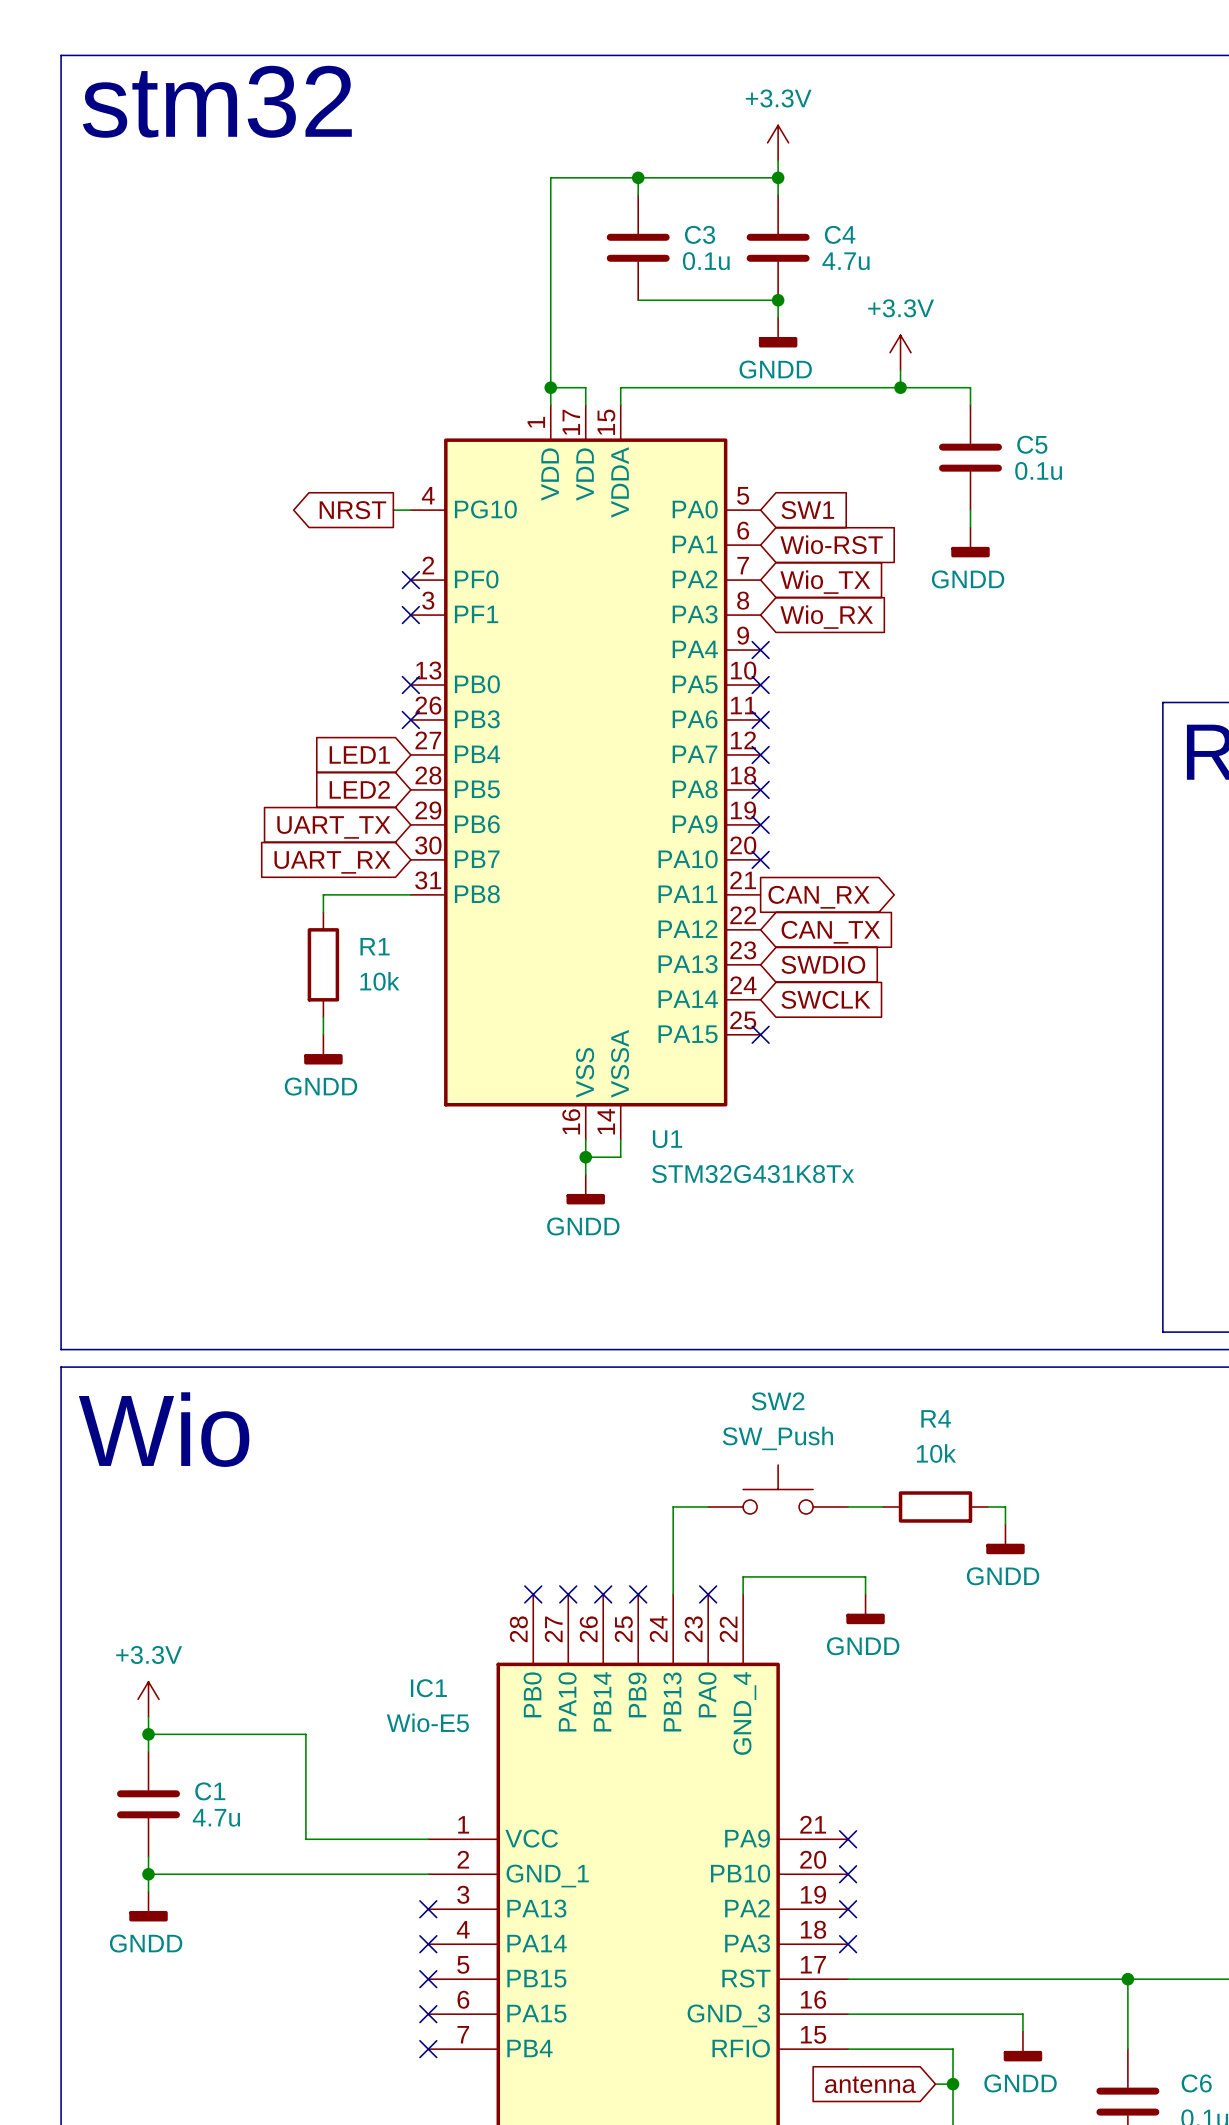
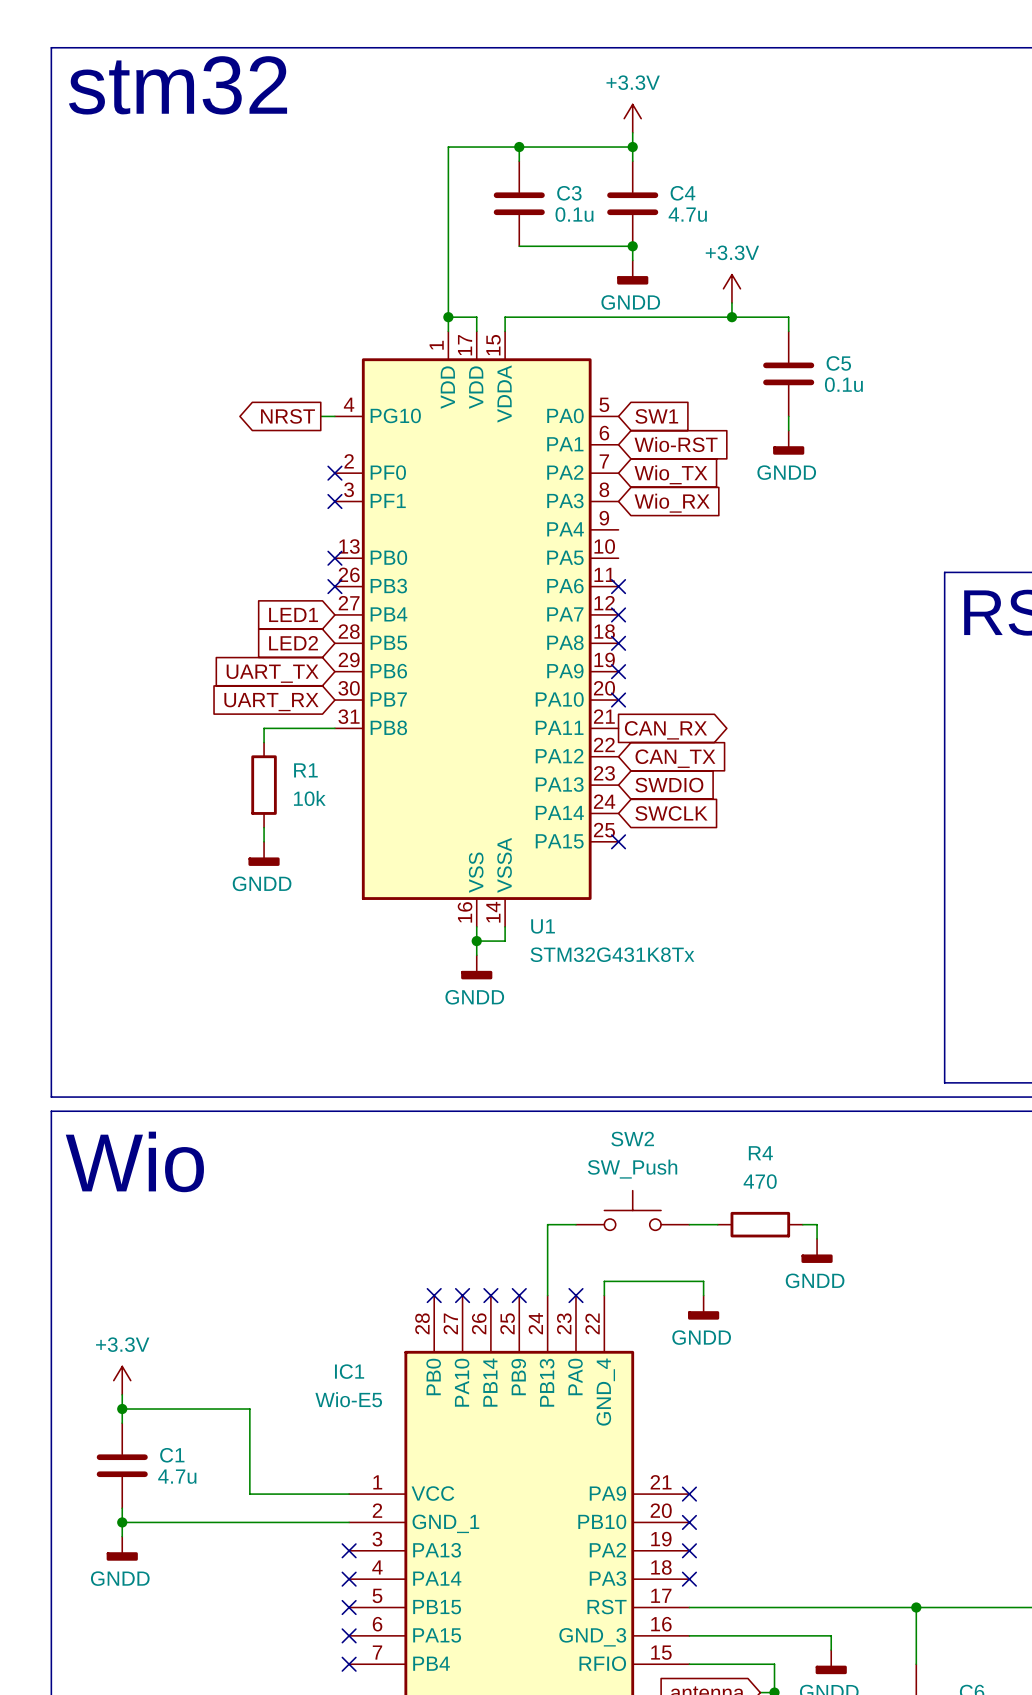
no-connect mark: (760, 650) -> none
no-connect mark: (760, 685) -> none
R4 value: 10k (936, 1453) -> 470 (760, 1181)

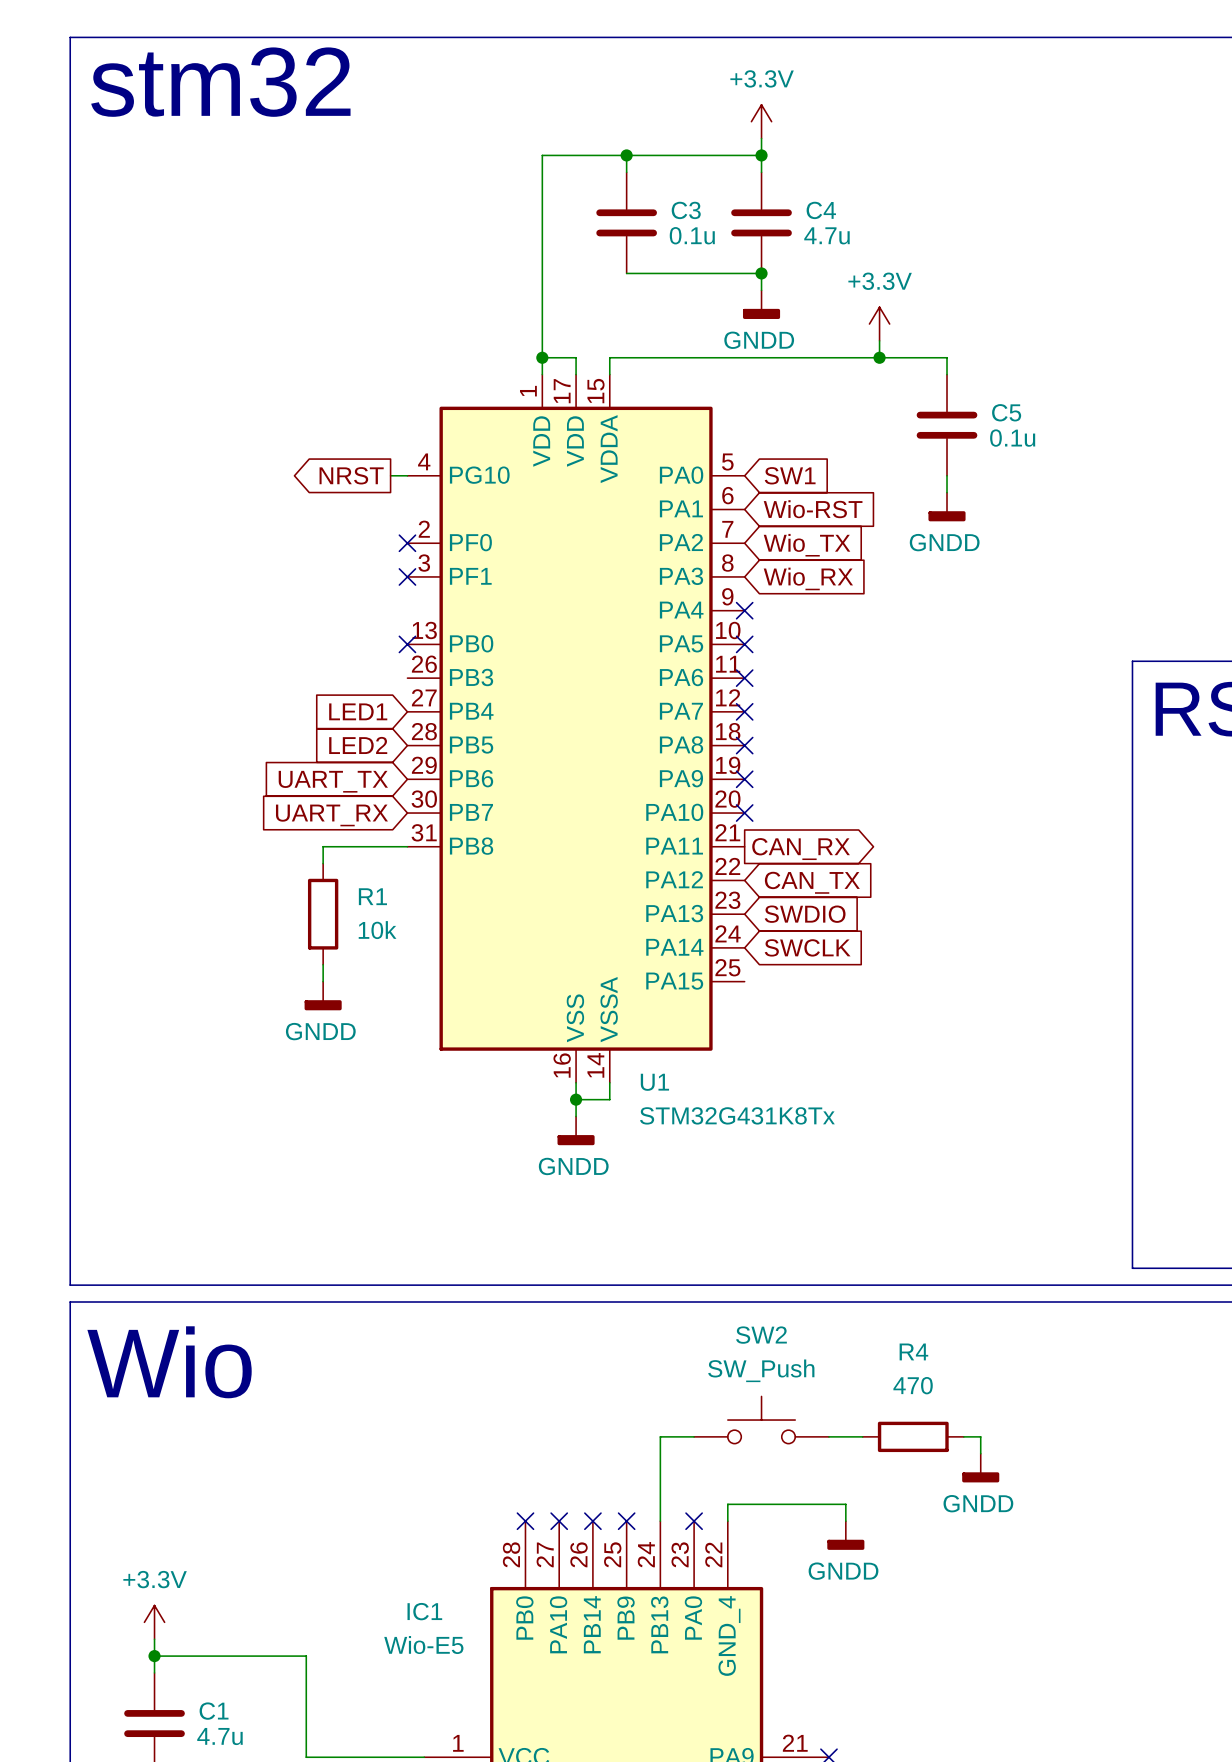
no-connect mark: none -> (744, 610)
no-connect mark: none -> (744, 644)
no-connect mark: (334, 586) -> none
no-connect mark: (618, 841) -> none

